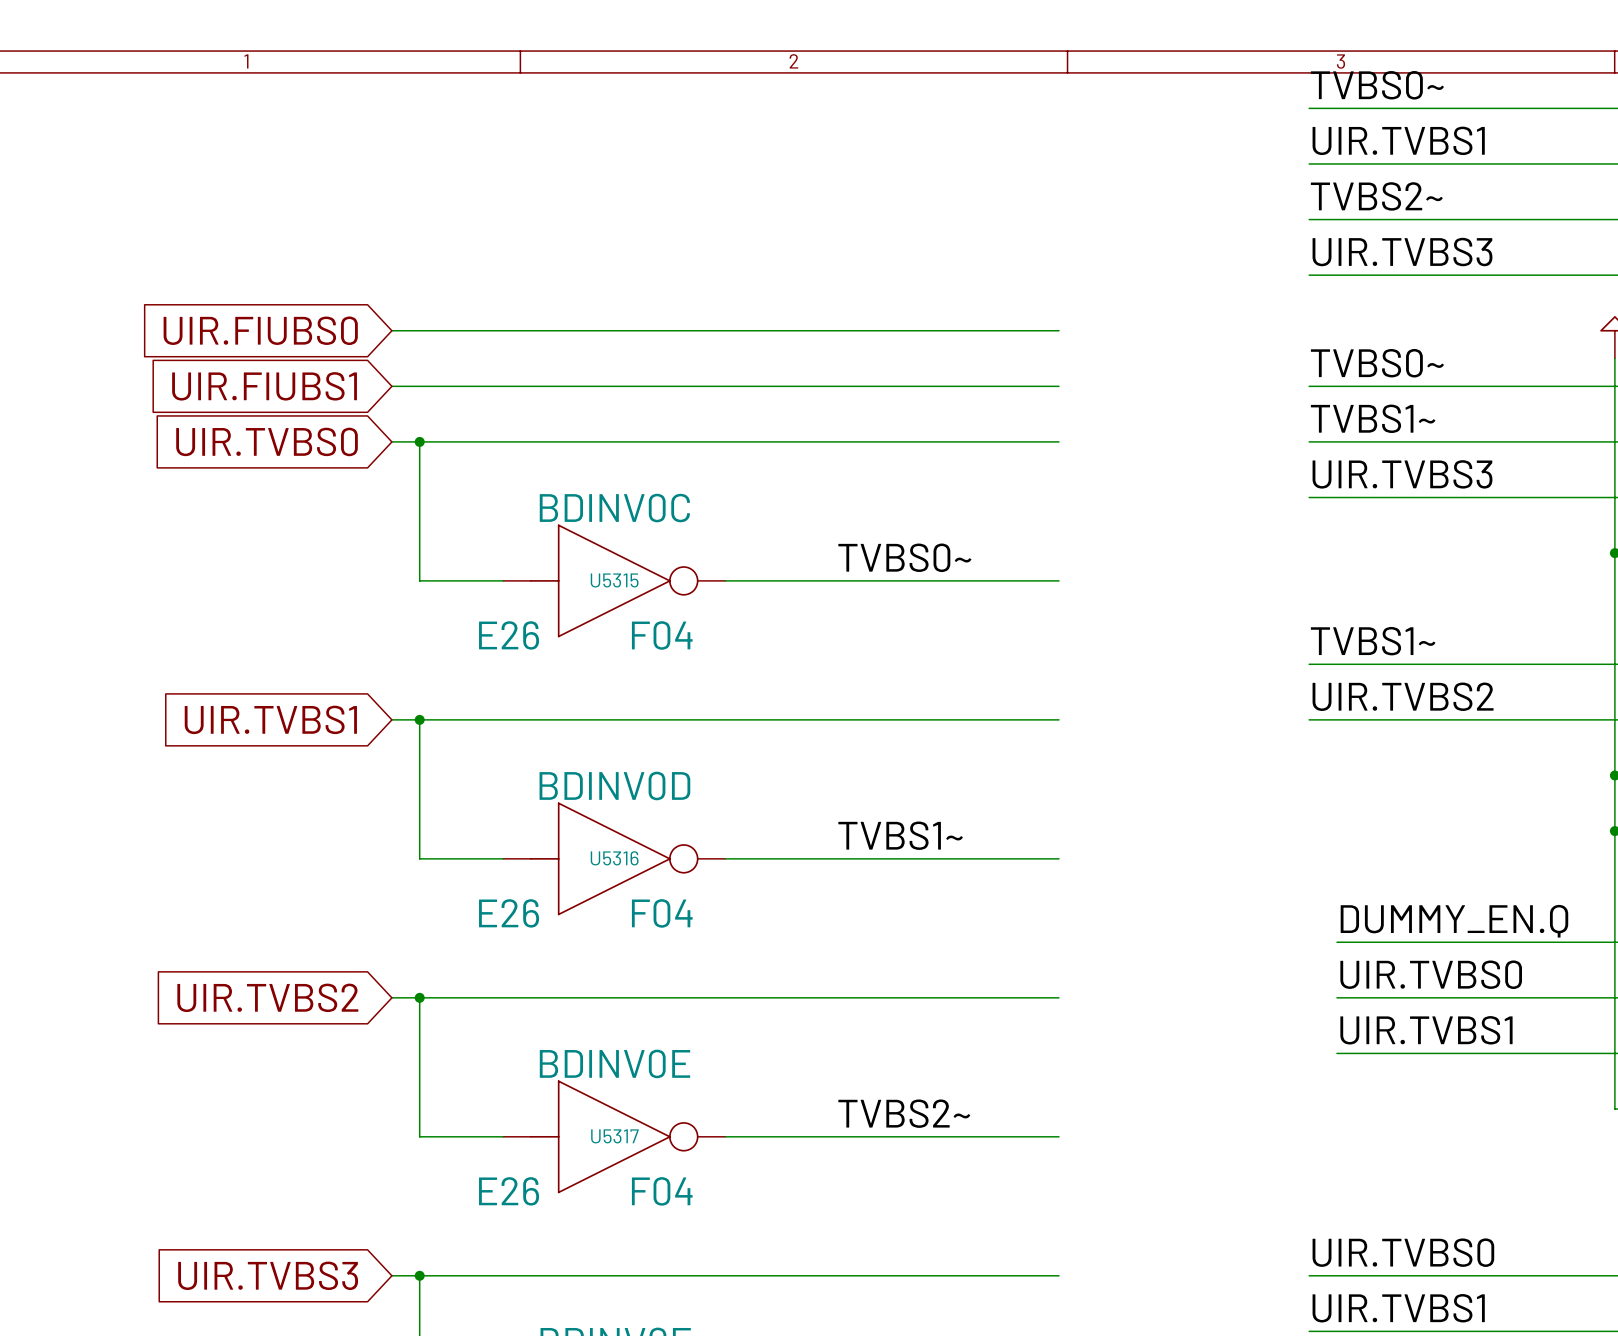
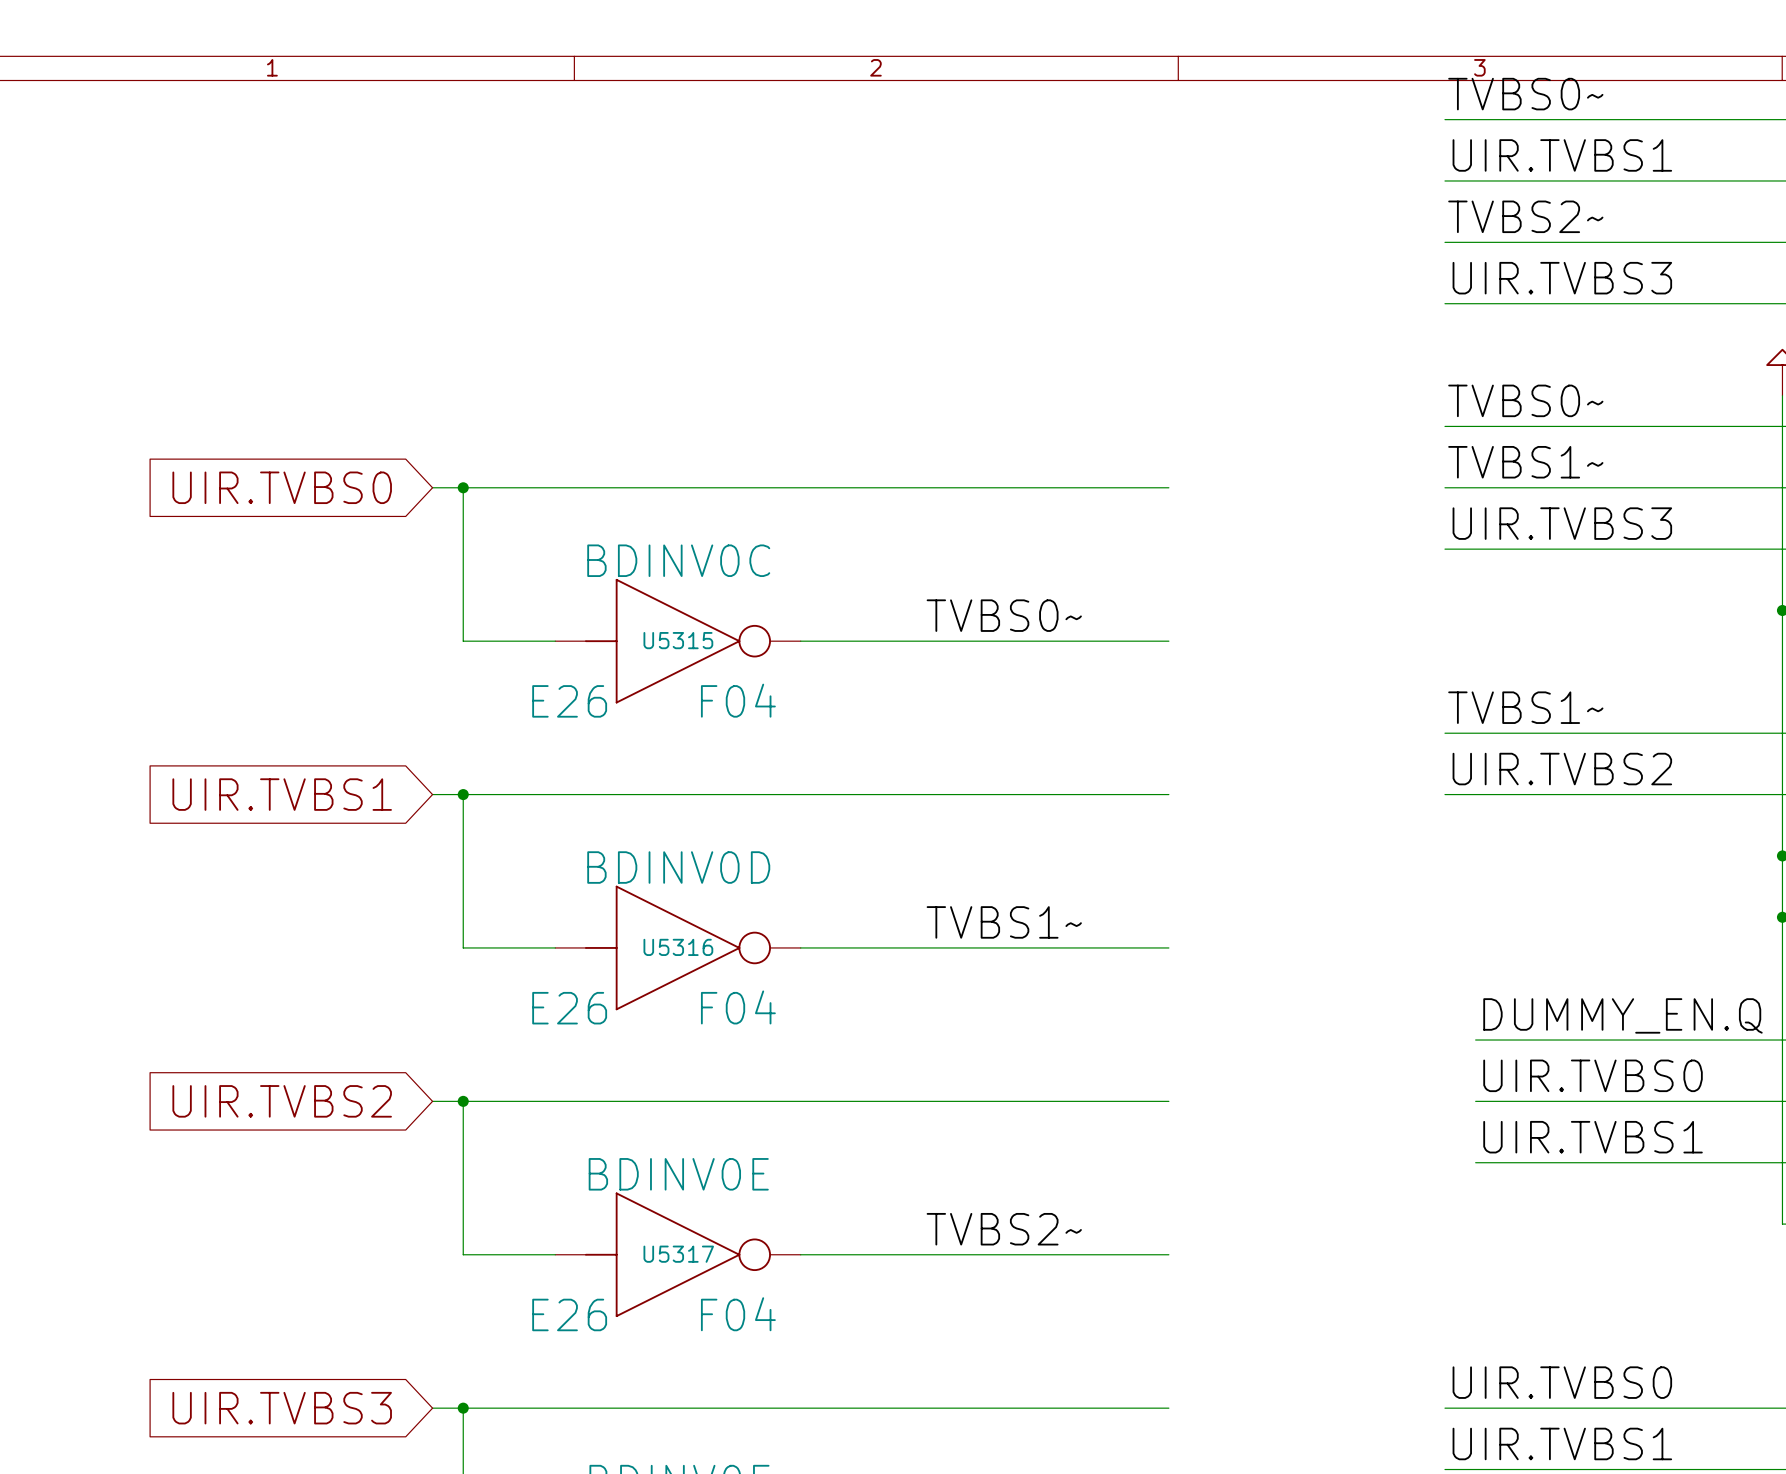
global label: UIR.FIUBS0 (260, 330) -> none
wire: (391, 330) (1059, 330) -> none
global label: UIR.FIUBS1 (264, 386) -> none
wire: (391, 386) (1059, 386) -> none

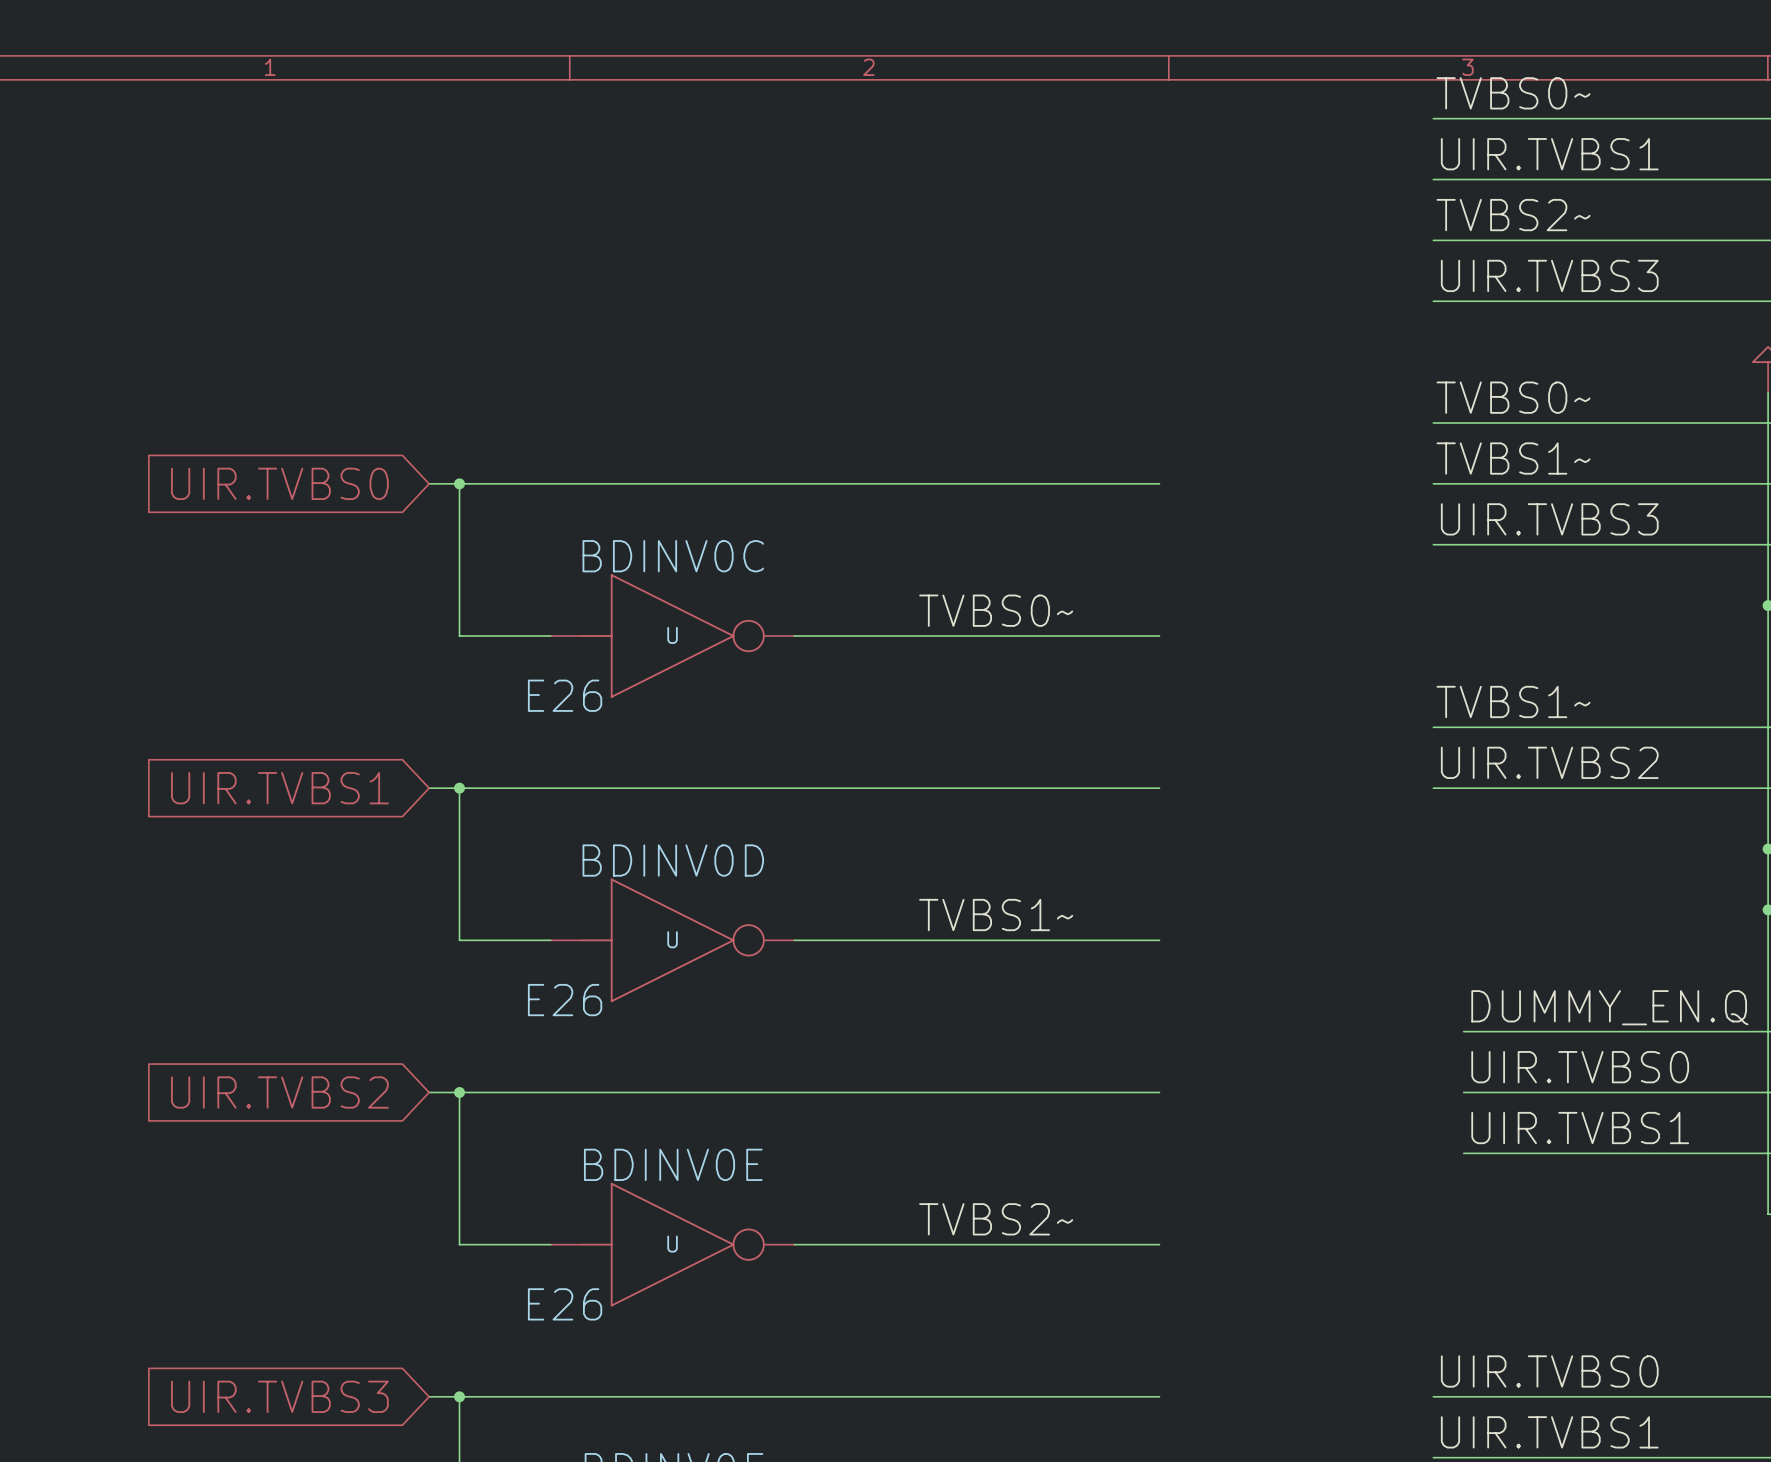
U5315 name: U5315 (678, 640) -> U (672, 635)
U5315 value: F04 (738, 700) -> none
U5316 name: U5316 (678, 947) -> U (672, 939)
U5316 value: F04 (738, 1007) -> none
U5317 name: U5317 (678, 1254) -> U (672, 1244)
U5317 value: F04 (738, 1314) -> none

